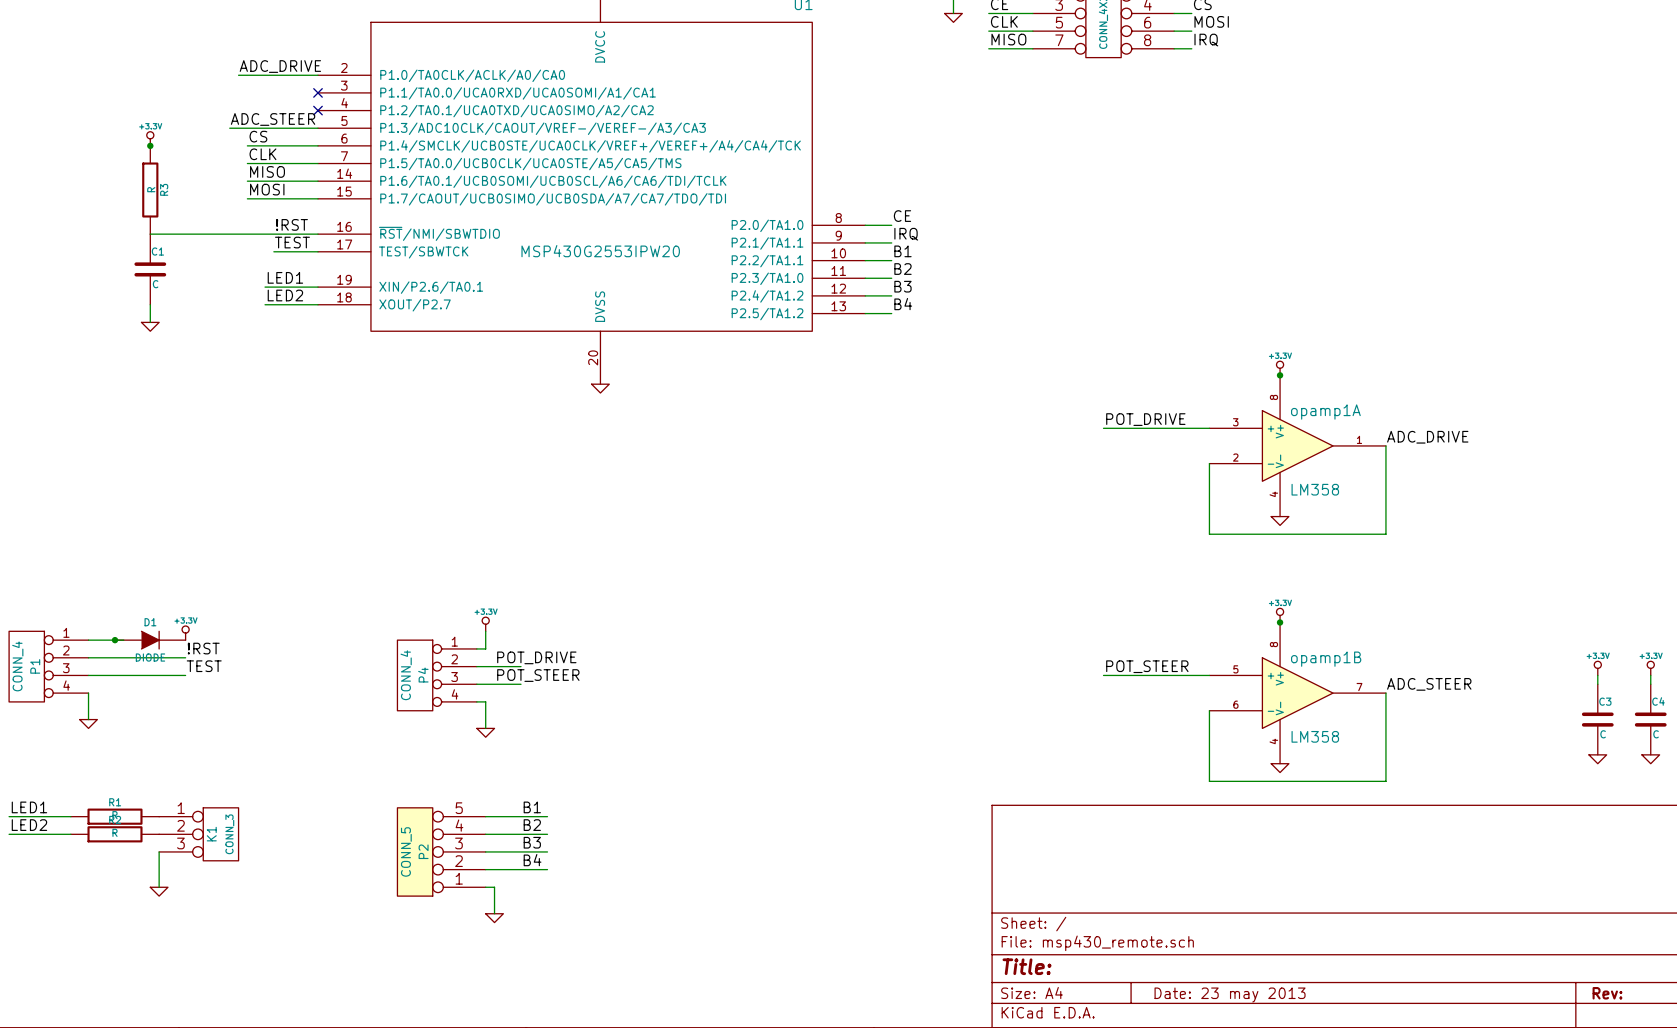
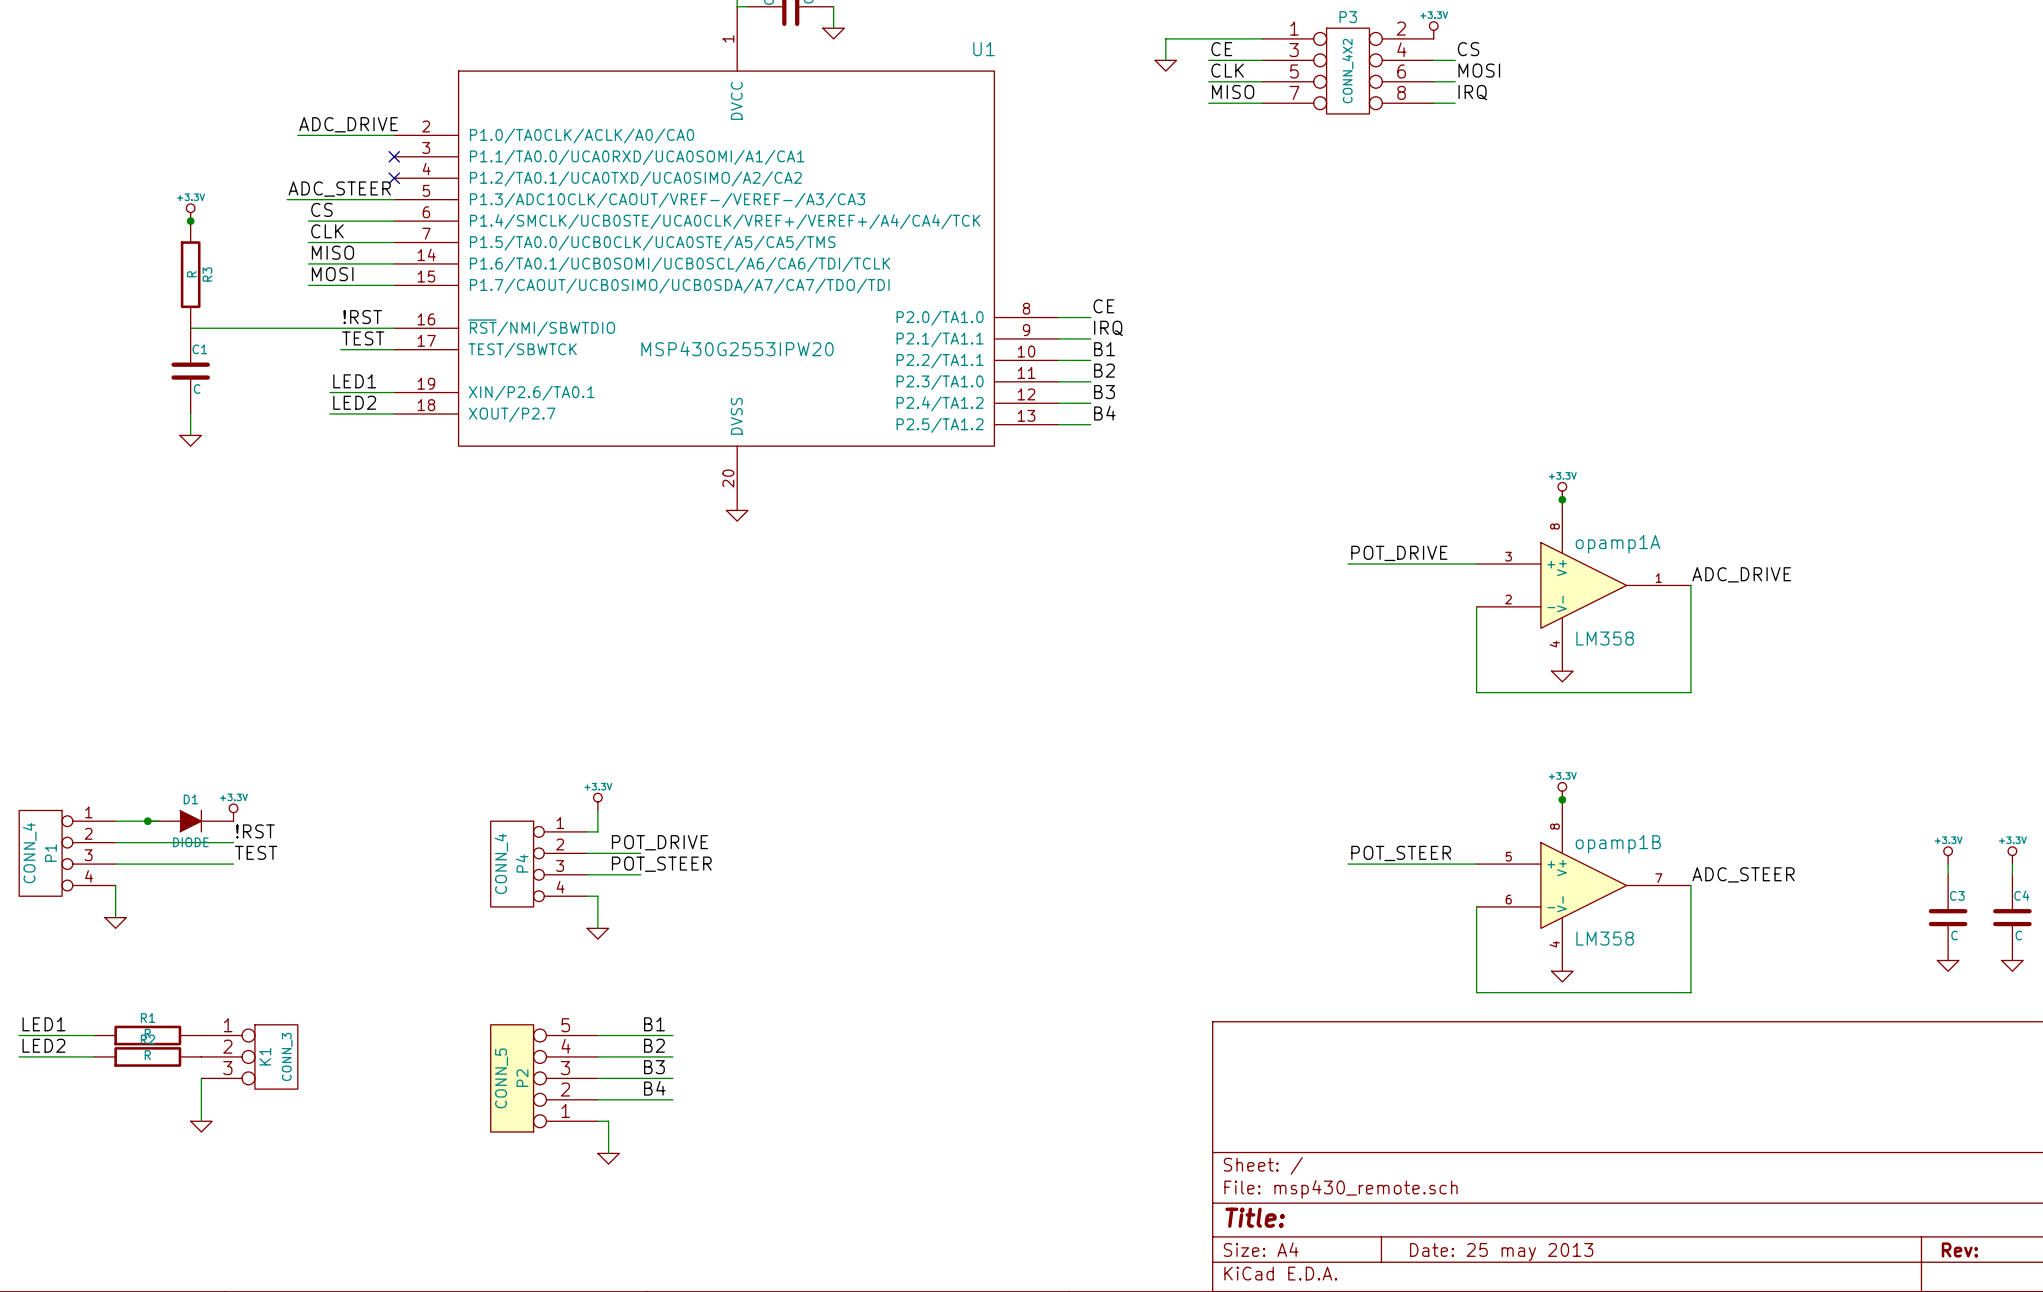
title block: Date: 23 may 2013 (1230, 995) -> Date: 25 may 2013 (1501, 1252)

